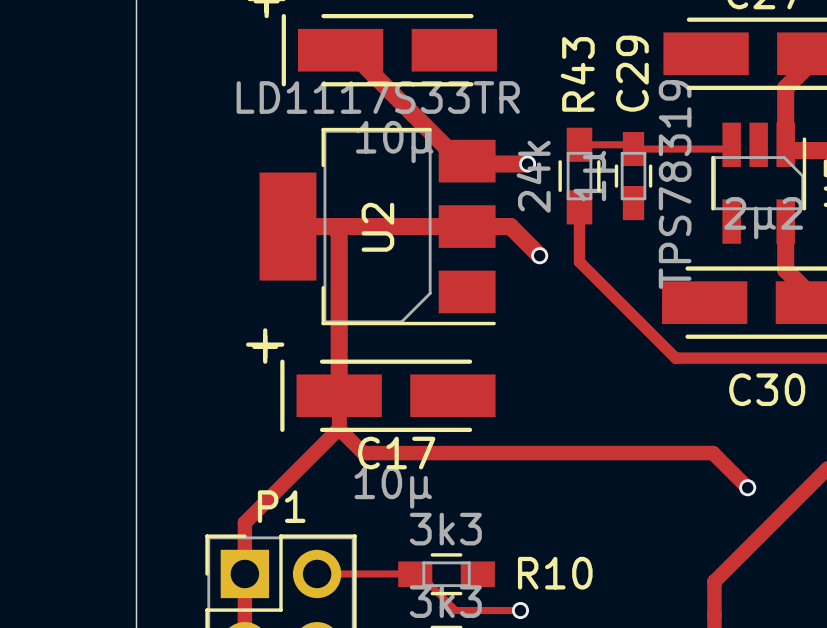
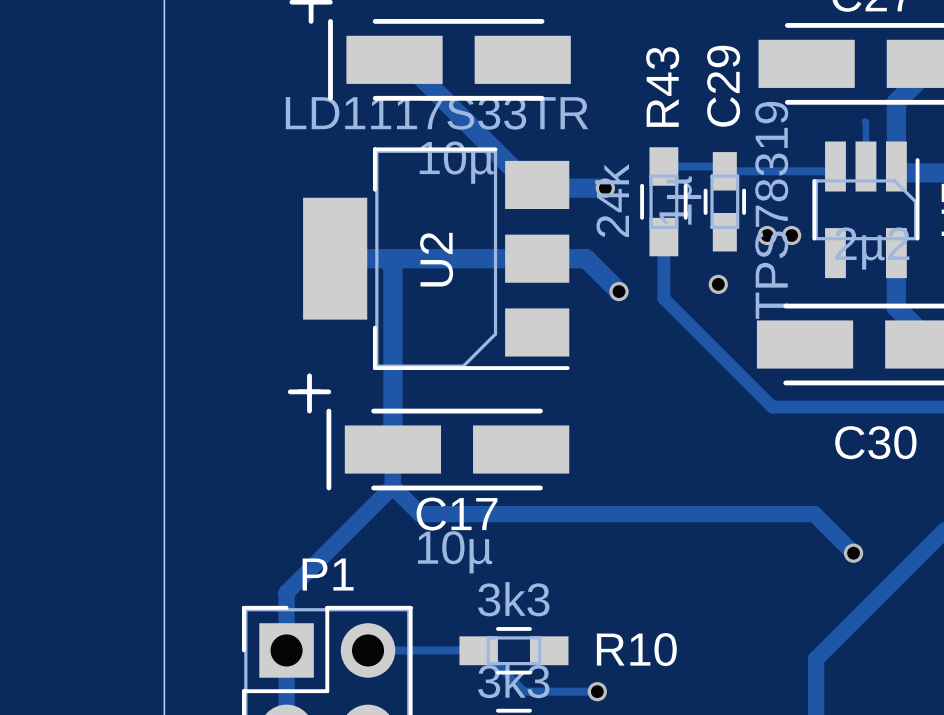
track: none -> (864, 121) (865, 166)
via: none -> (767, 235)
via: none -> (791, 235)
via: none -> (718, 284)

